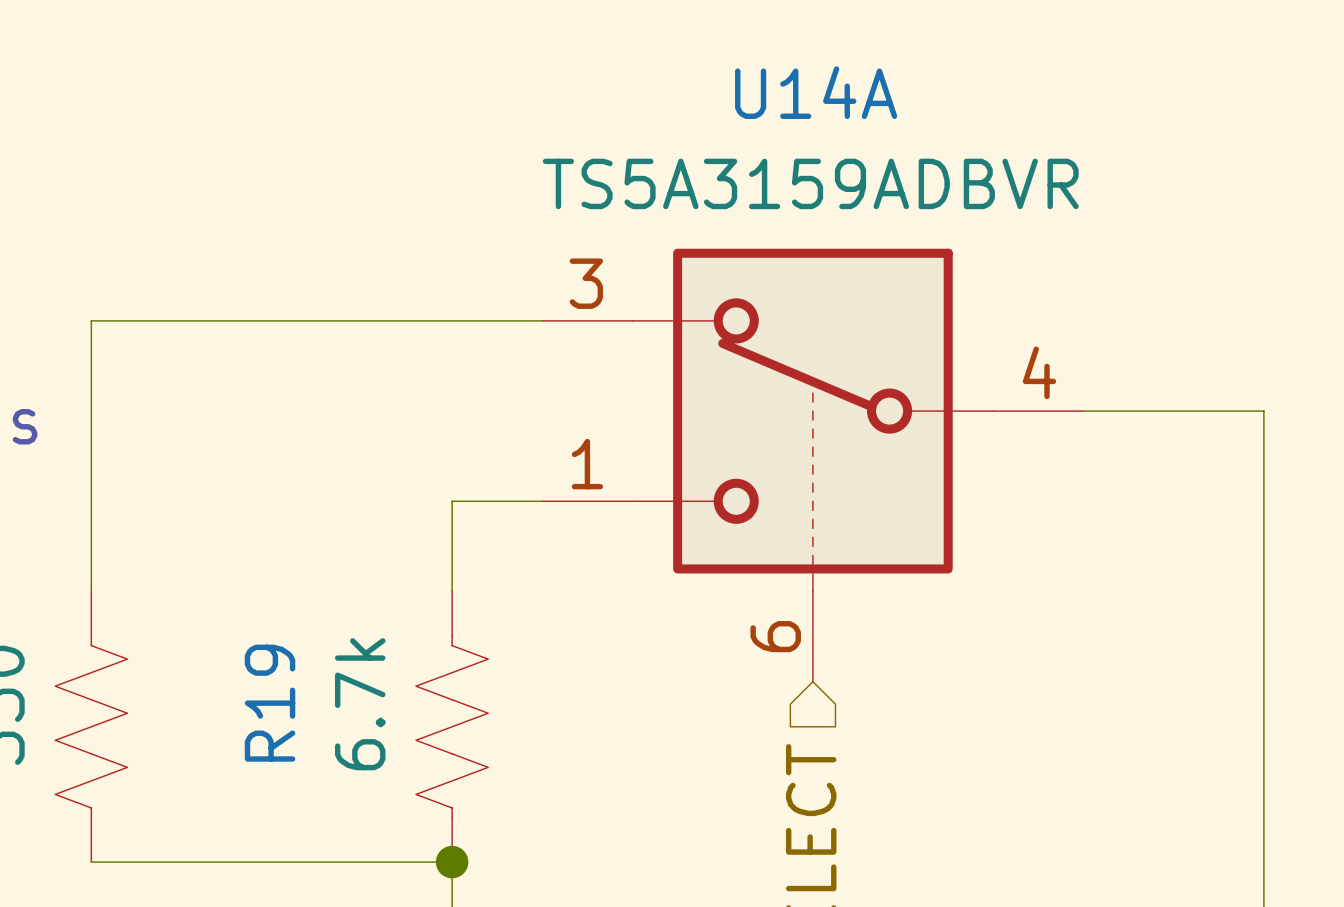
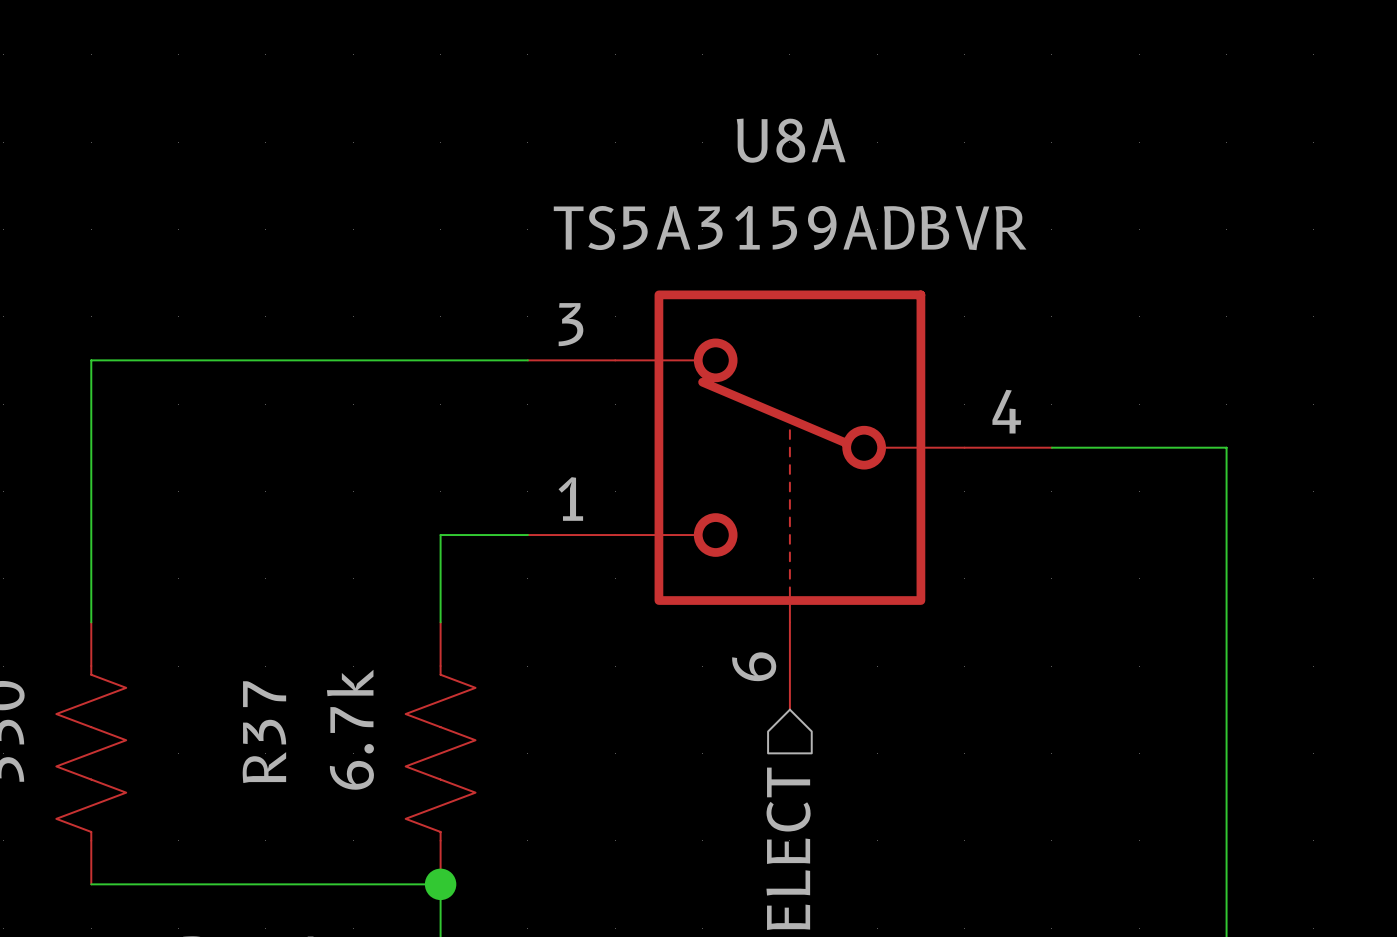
U14A name: U14A (816, 92) -> U8A (791, 140)
R19 name: R19 (270, 703) -> R37 (264, 732)

